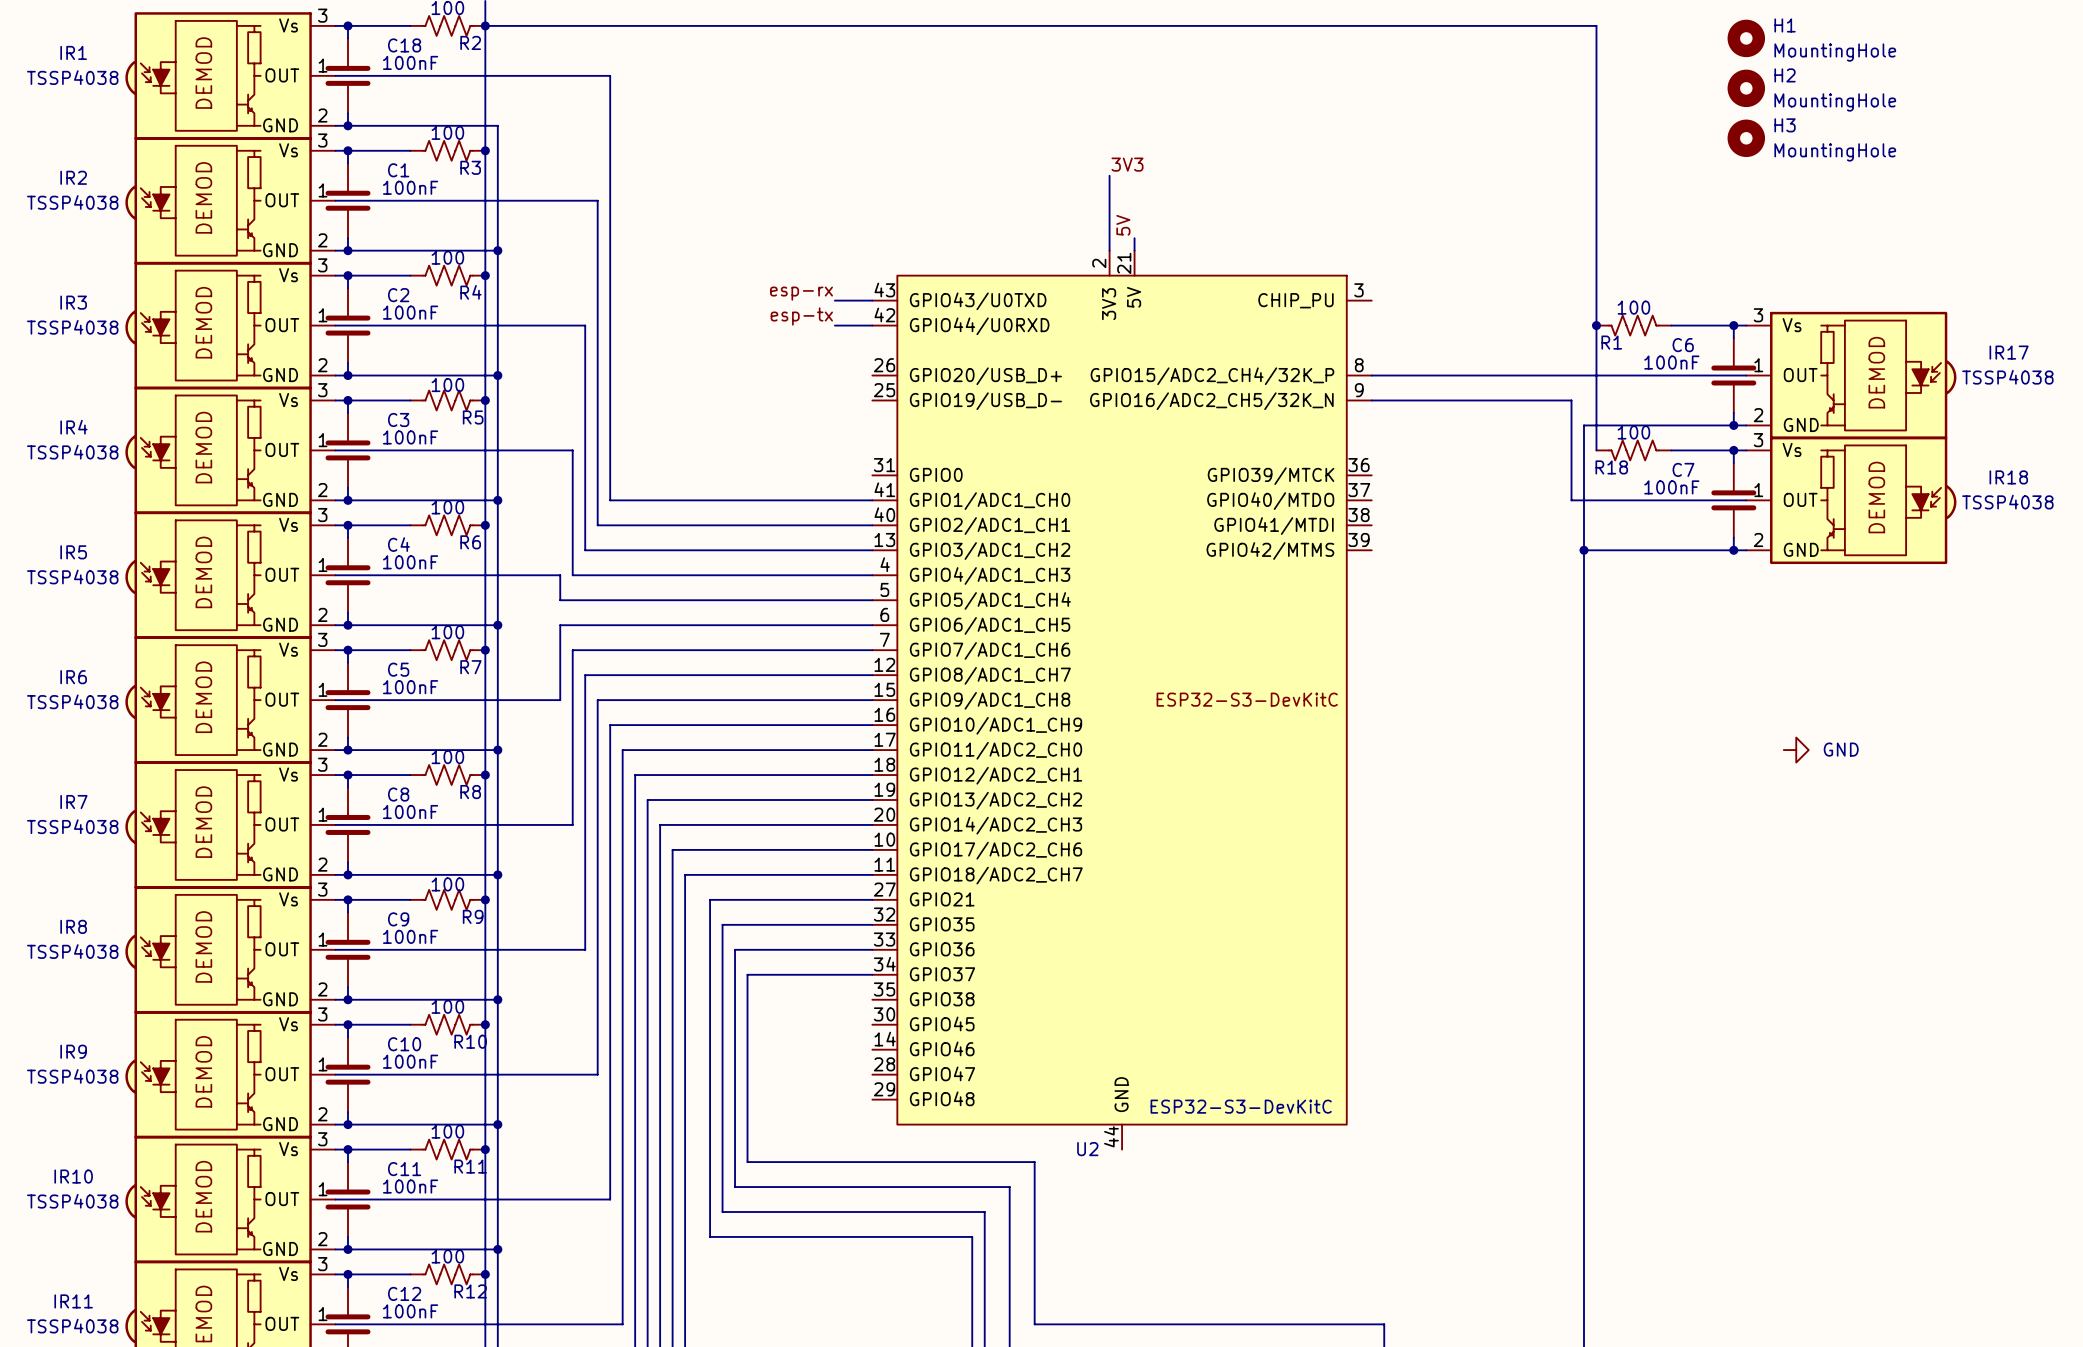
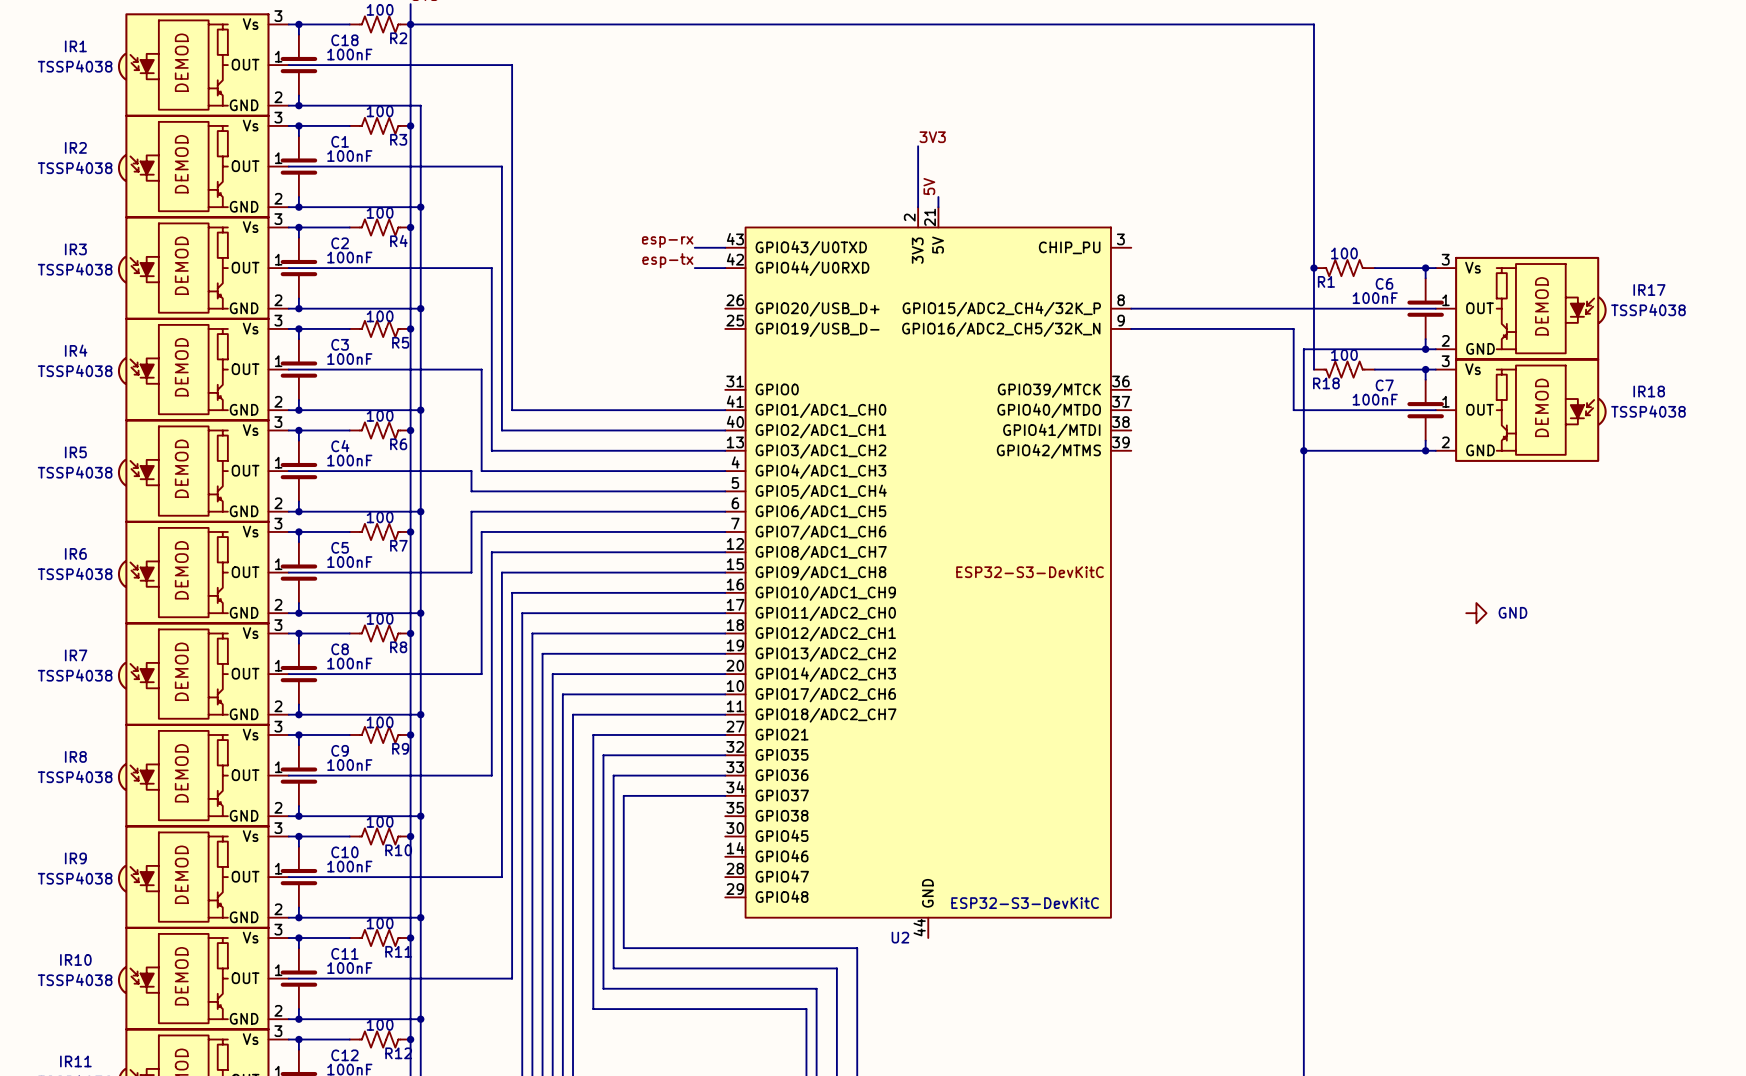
H1: MountingHole (1746, 38) -> none
H2: MountingHole (1746, 88) -> none
H3: MountingHole (1746, 138) -> none

